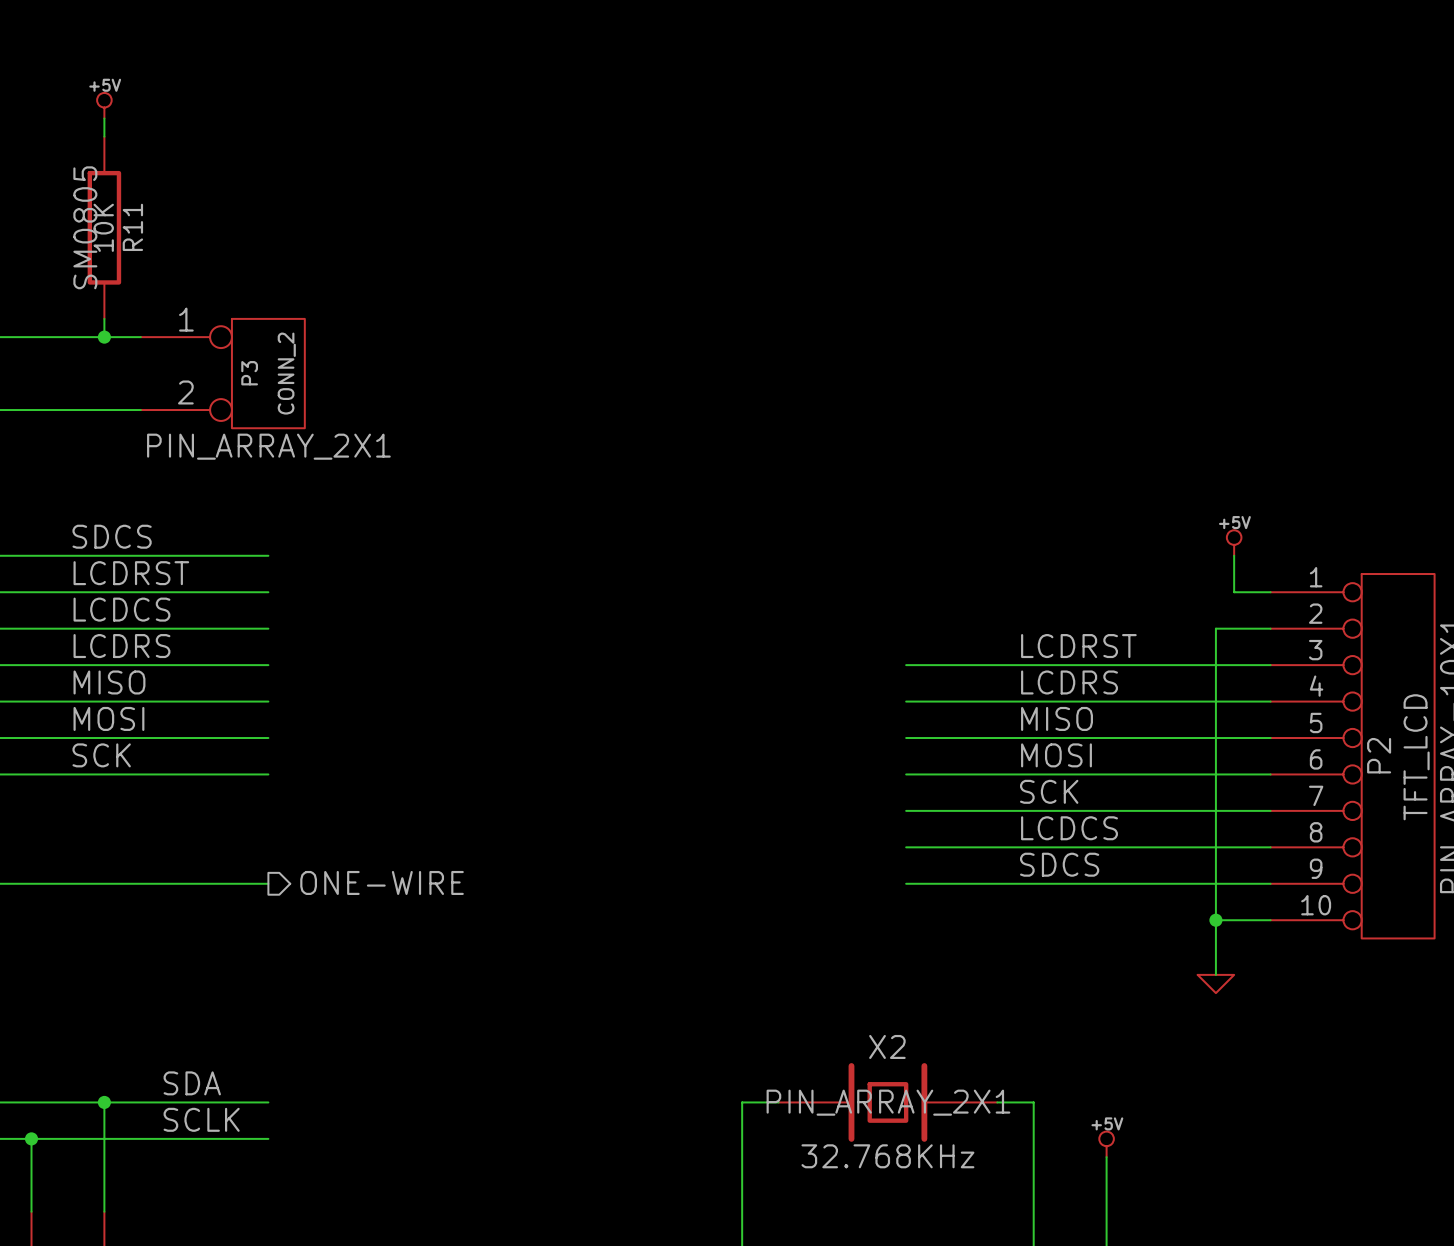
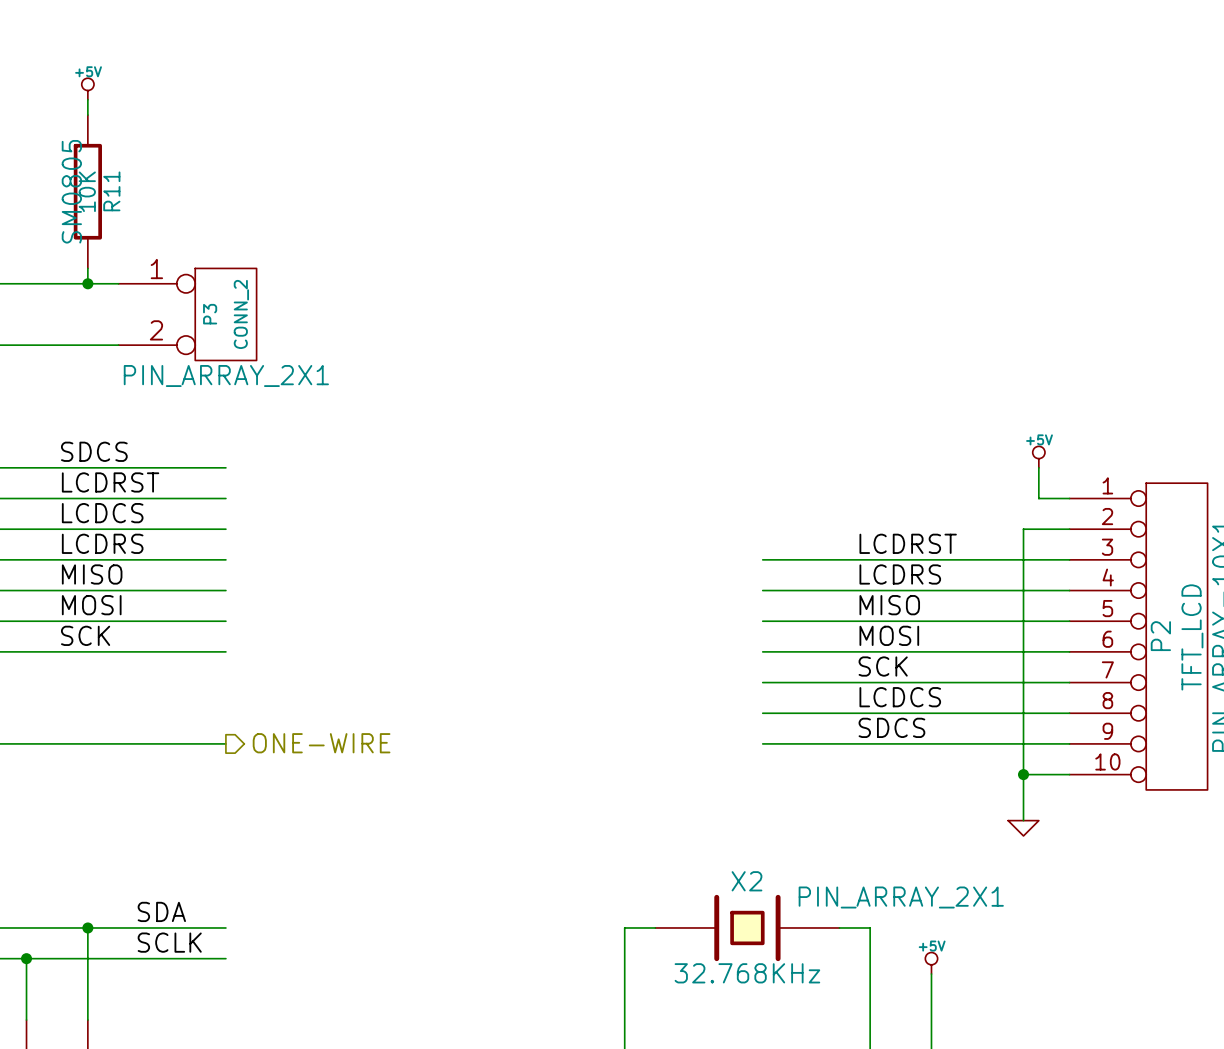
X2 text position: PIN_ARRAY_2X1 (888, 1102) -> PIN_ARRAY_2X1 (901, 897)

